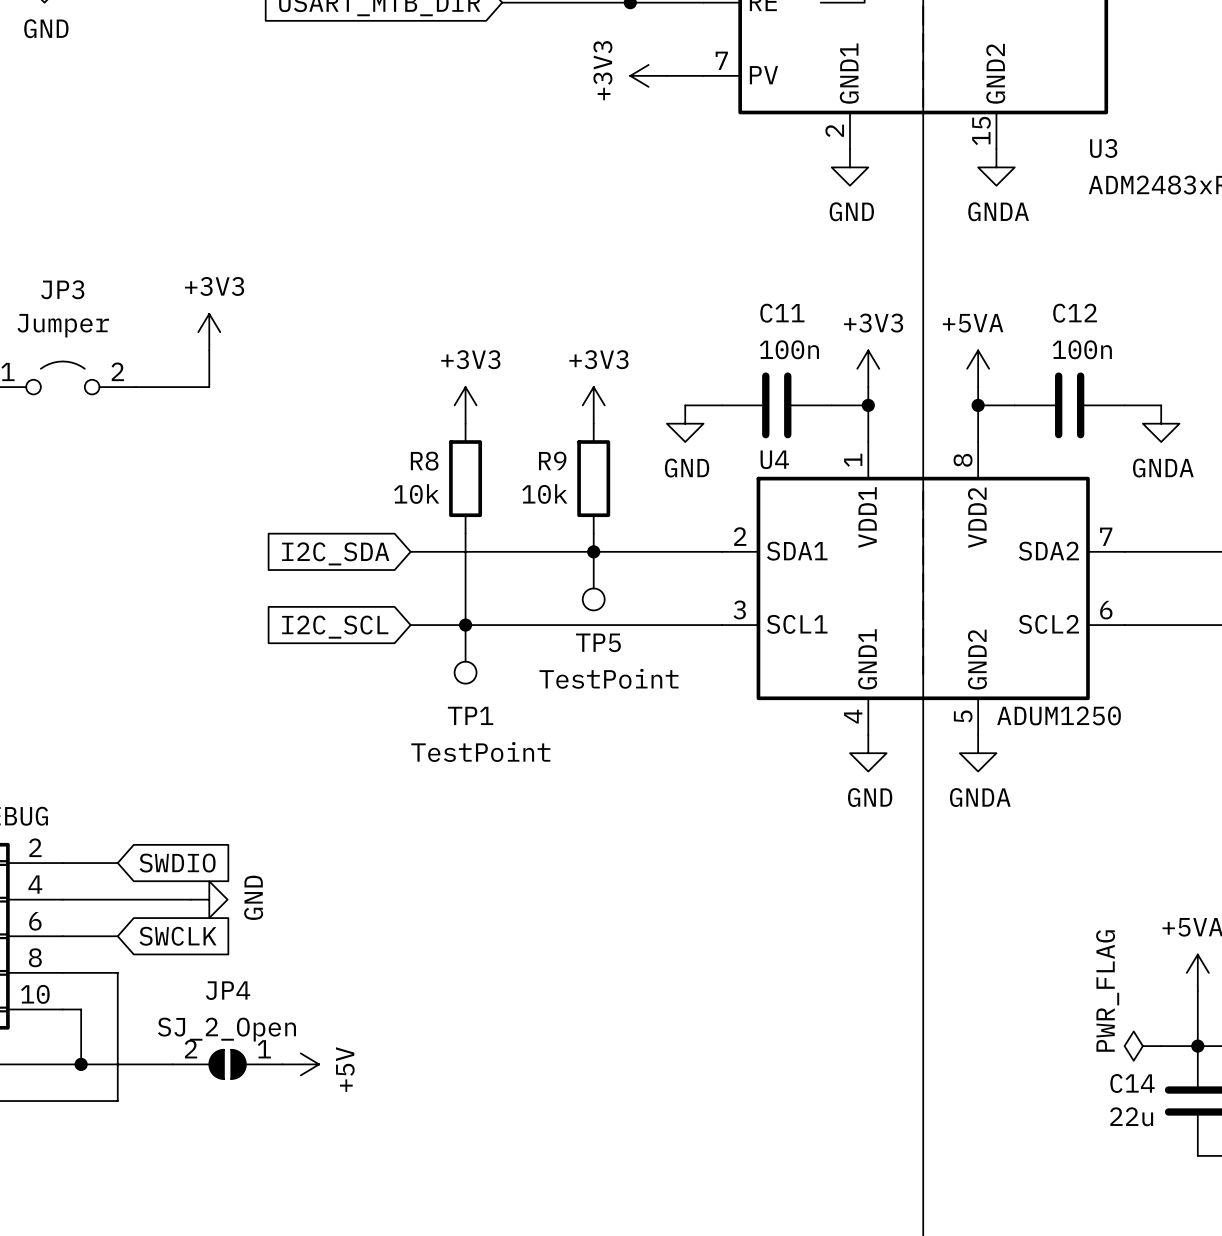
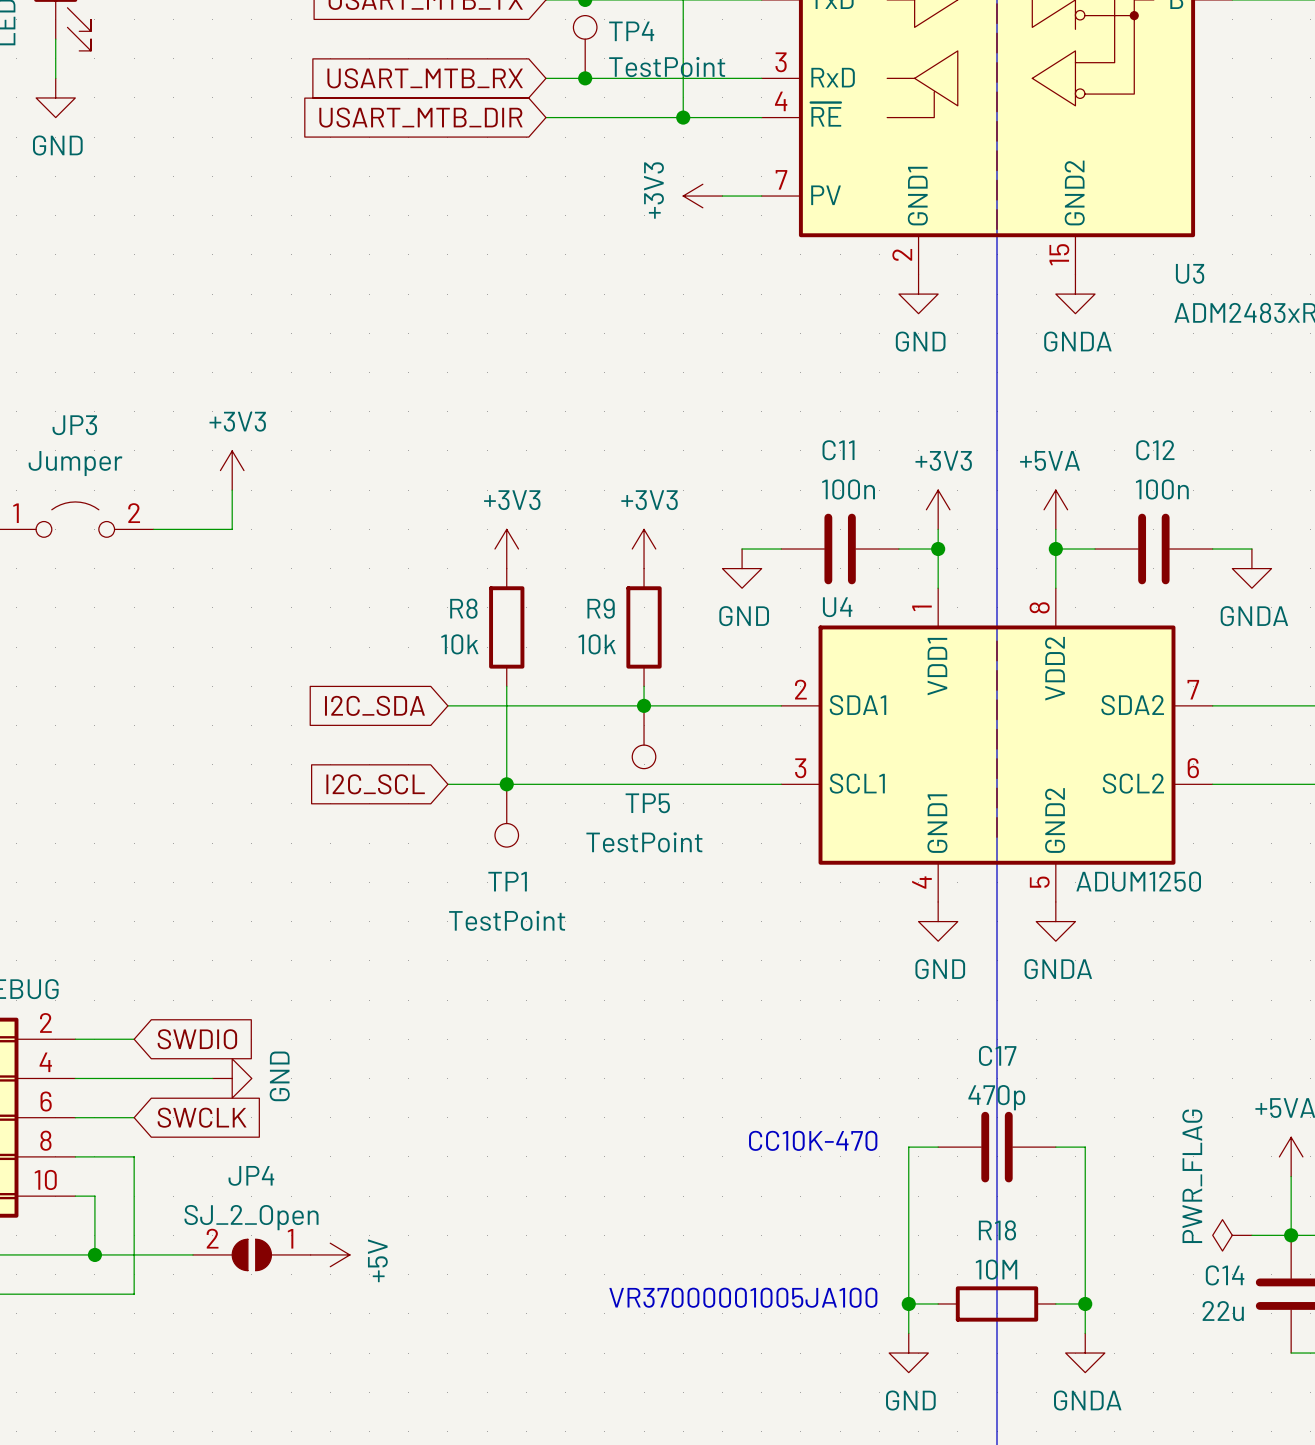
text: none -> CC10K-470 (813, 1140)
wire: none -> (938, 1147) (908, 1147) (908, 1333)
C17: none -> 470p (997, 1147)
wire: none -> (1055, 1147) (1085, 1147) (1085, 1333)
text: none -> VR37000001005JA100 (743, 1297)
wire: none -> (908, 1303) (938, 1303)
junction: none -> (908, 1303)
R18: none -> 10M (997, 1303)
wire: none -> (1055, 1303) (1085, 1303)
junction: none -> (1085, 1303)
power symbol: none -> GND (908, 1353)
power symbol: none -> GNDA (1085, 1353)

